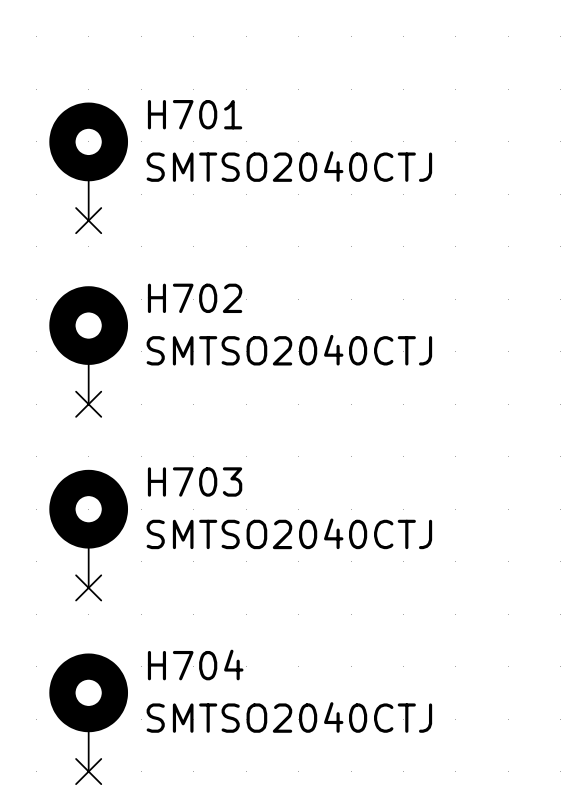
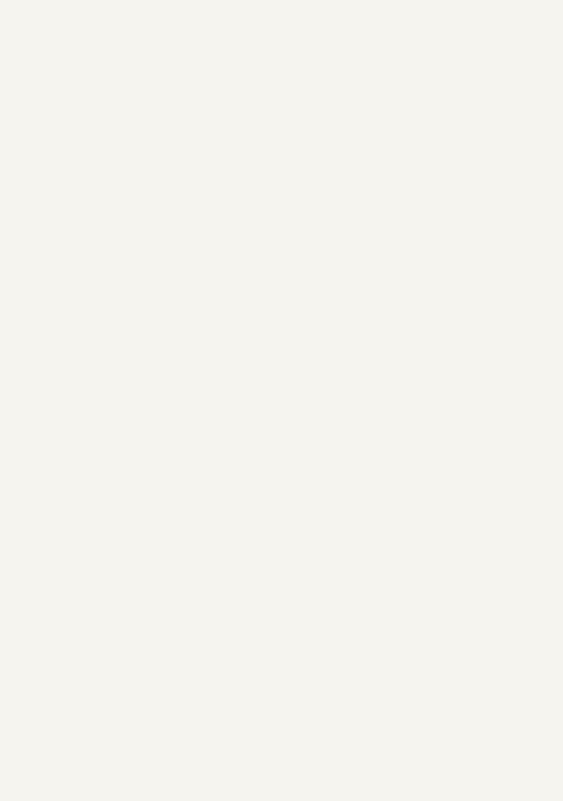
H701: SMTSO2040CTJ (88, 161) -> none
no-connect mark: (88, 220) -> none
H702: SMTSO2040CTJ (88, 345) -> none
no-connect mark: (88, 404) -> none
H703: SMTSO2040CTJ (88, 528) -> none
no-connect mark: (88, 587) -> none
H704: SMTSO2040CTJ (88, 712) -> none
no-connect mark: (88, 771) -> none

